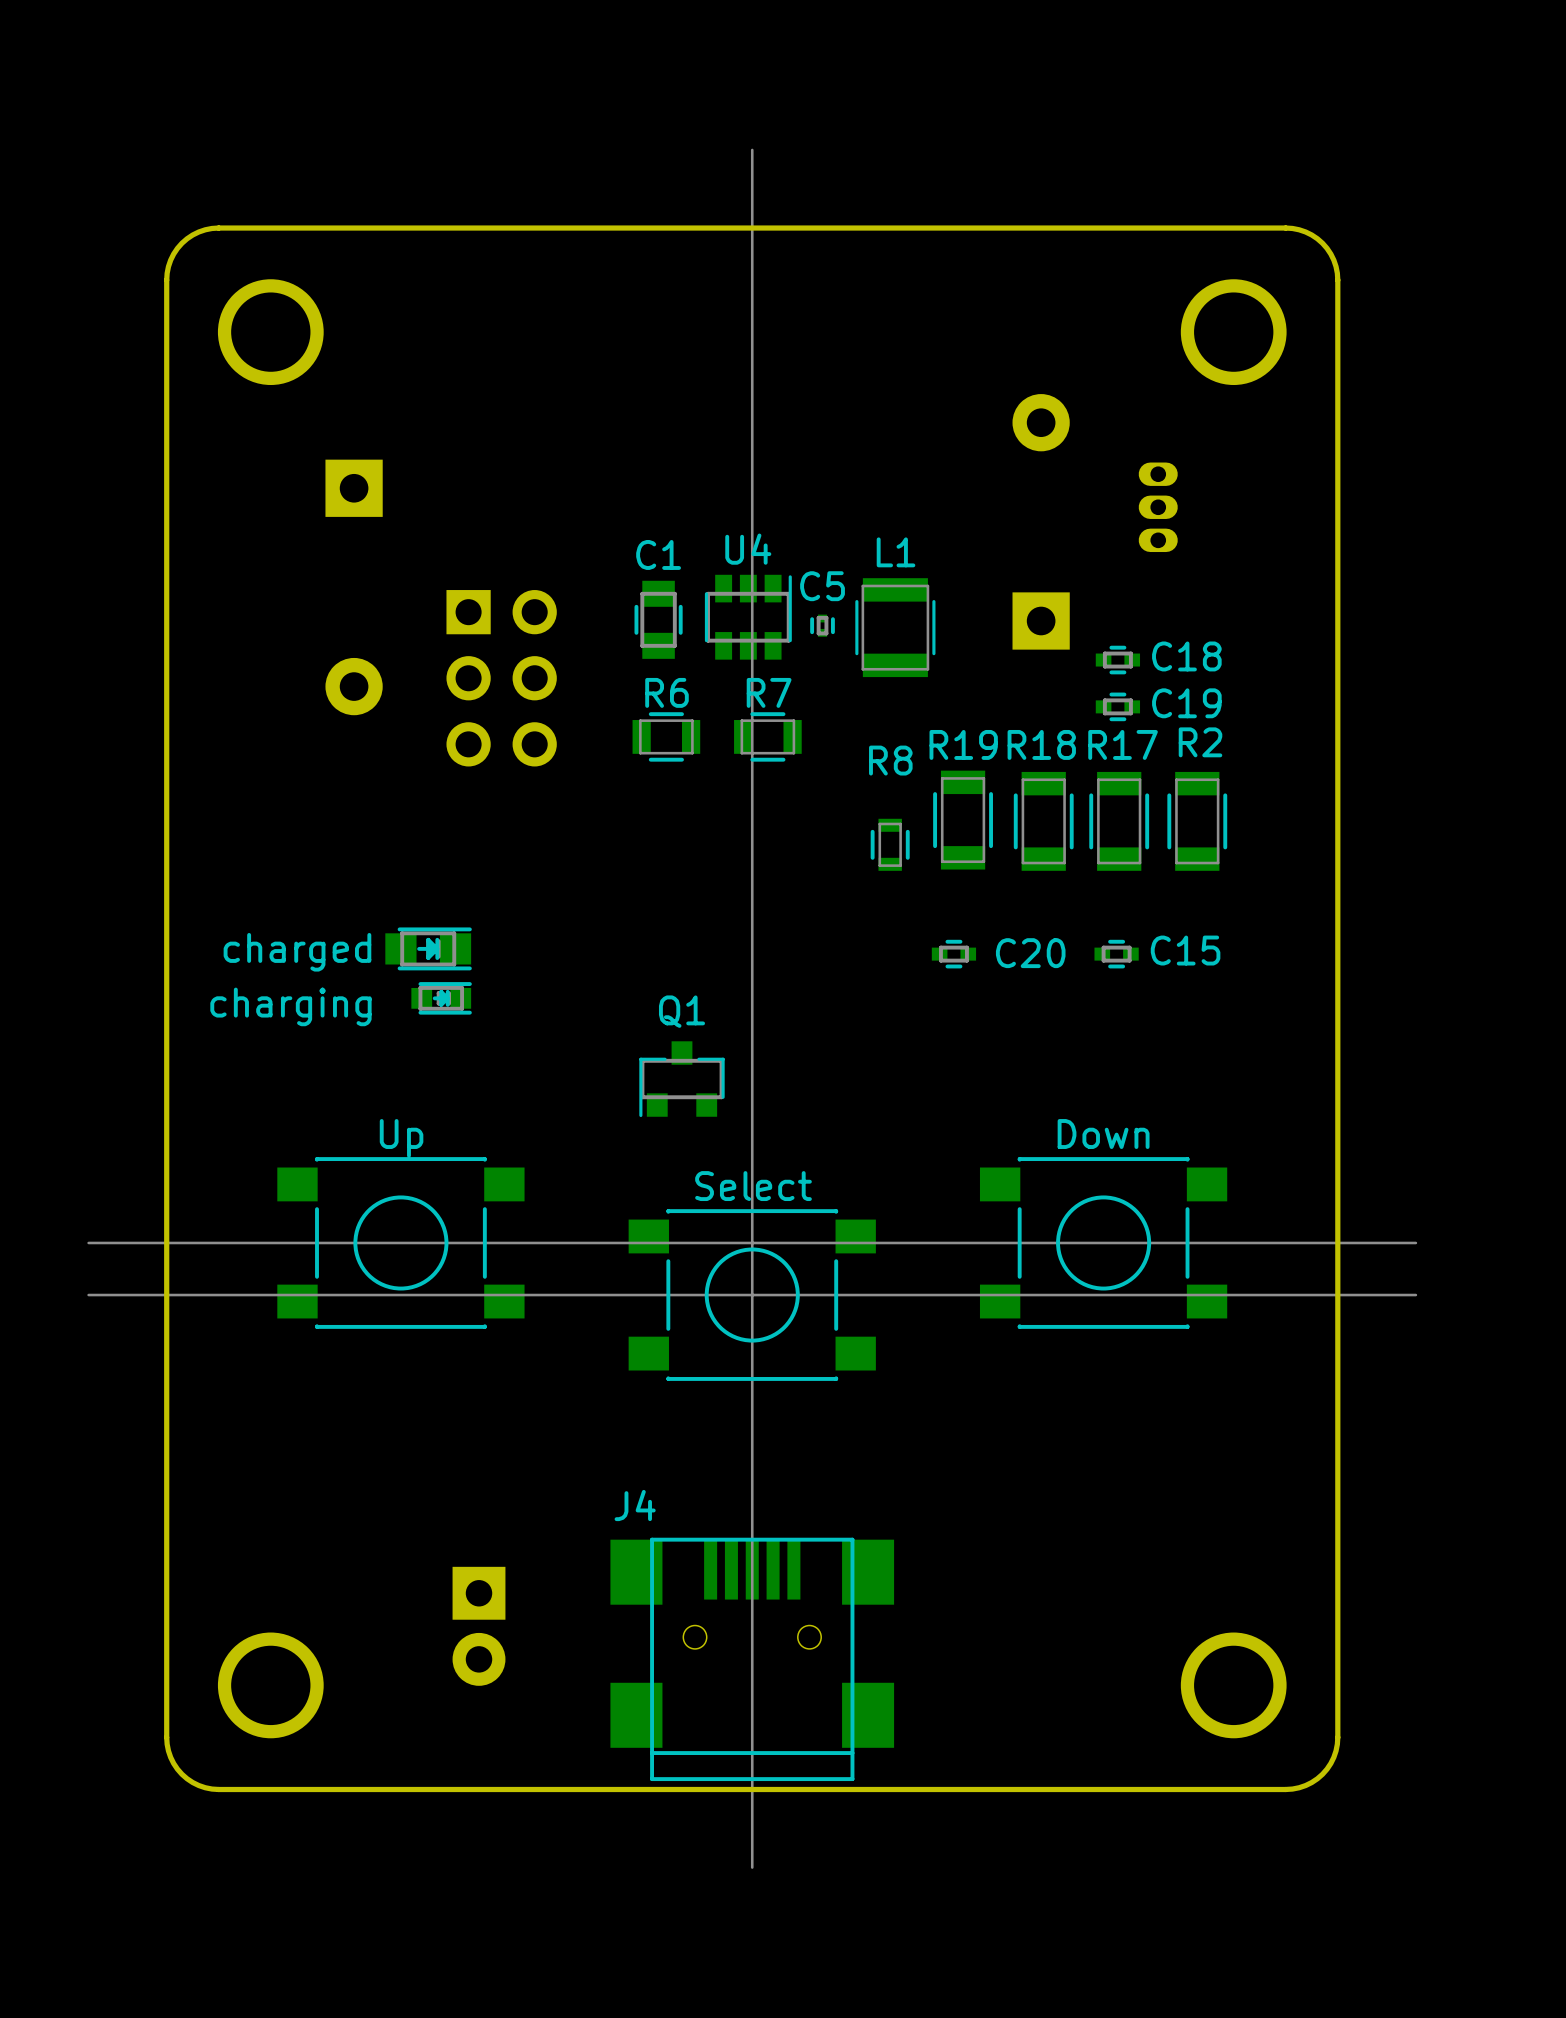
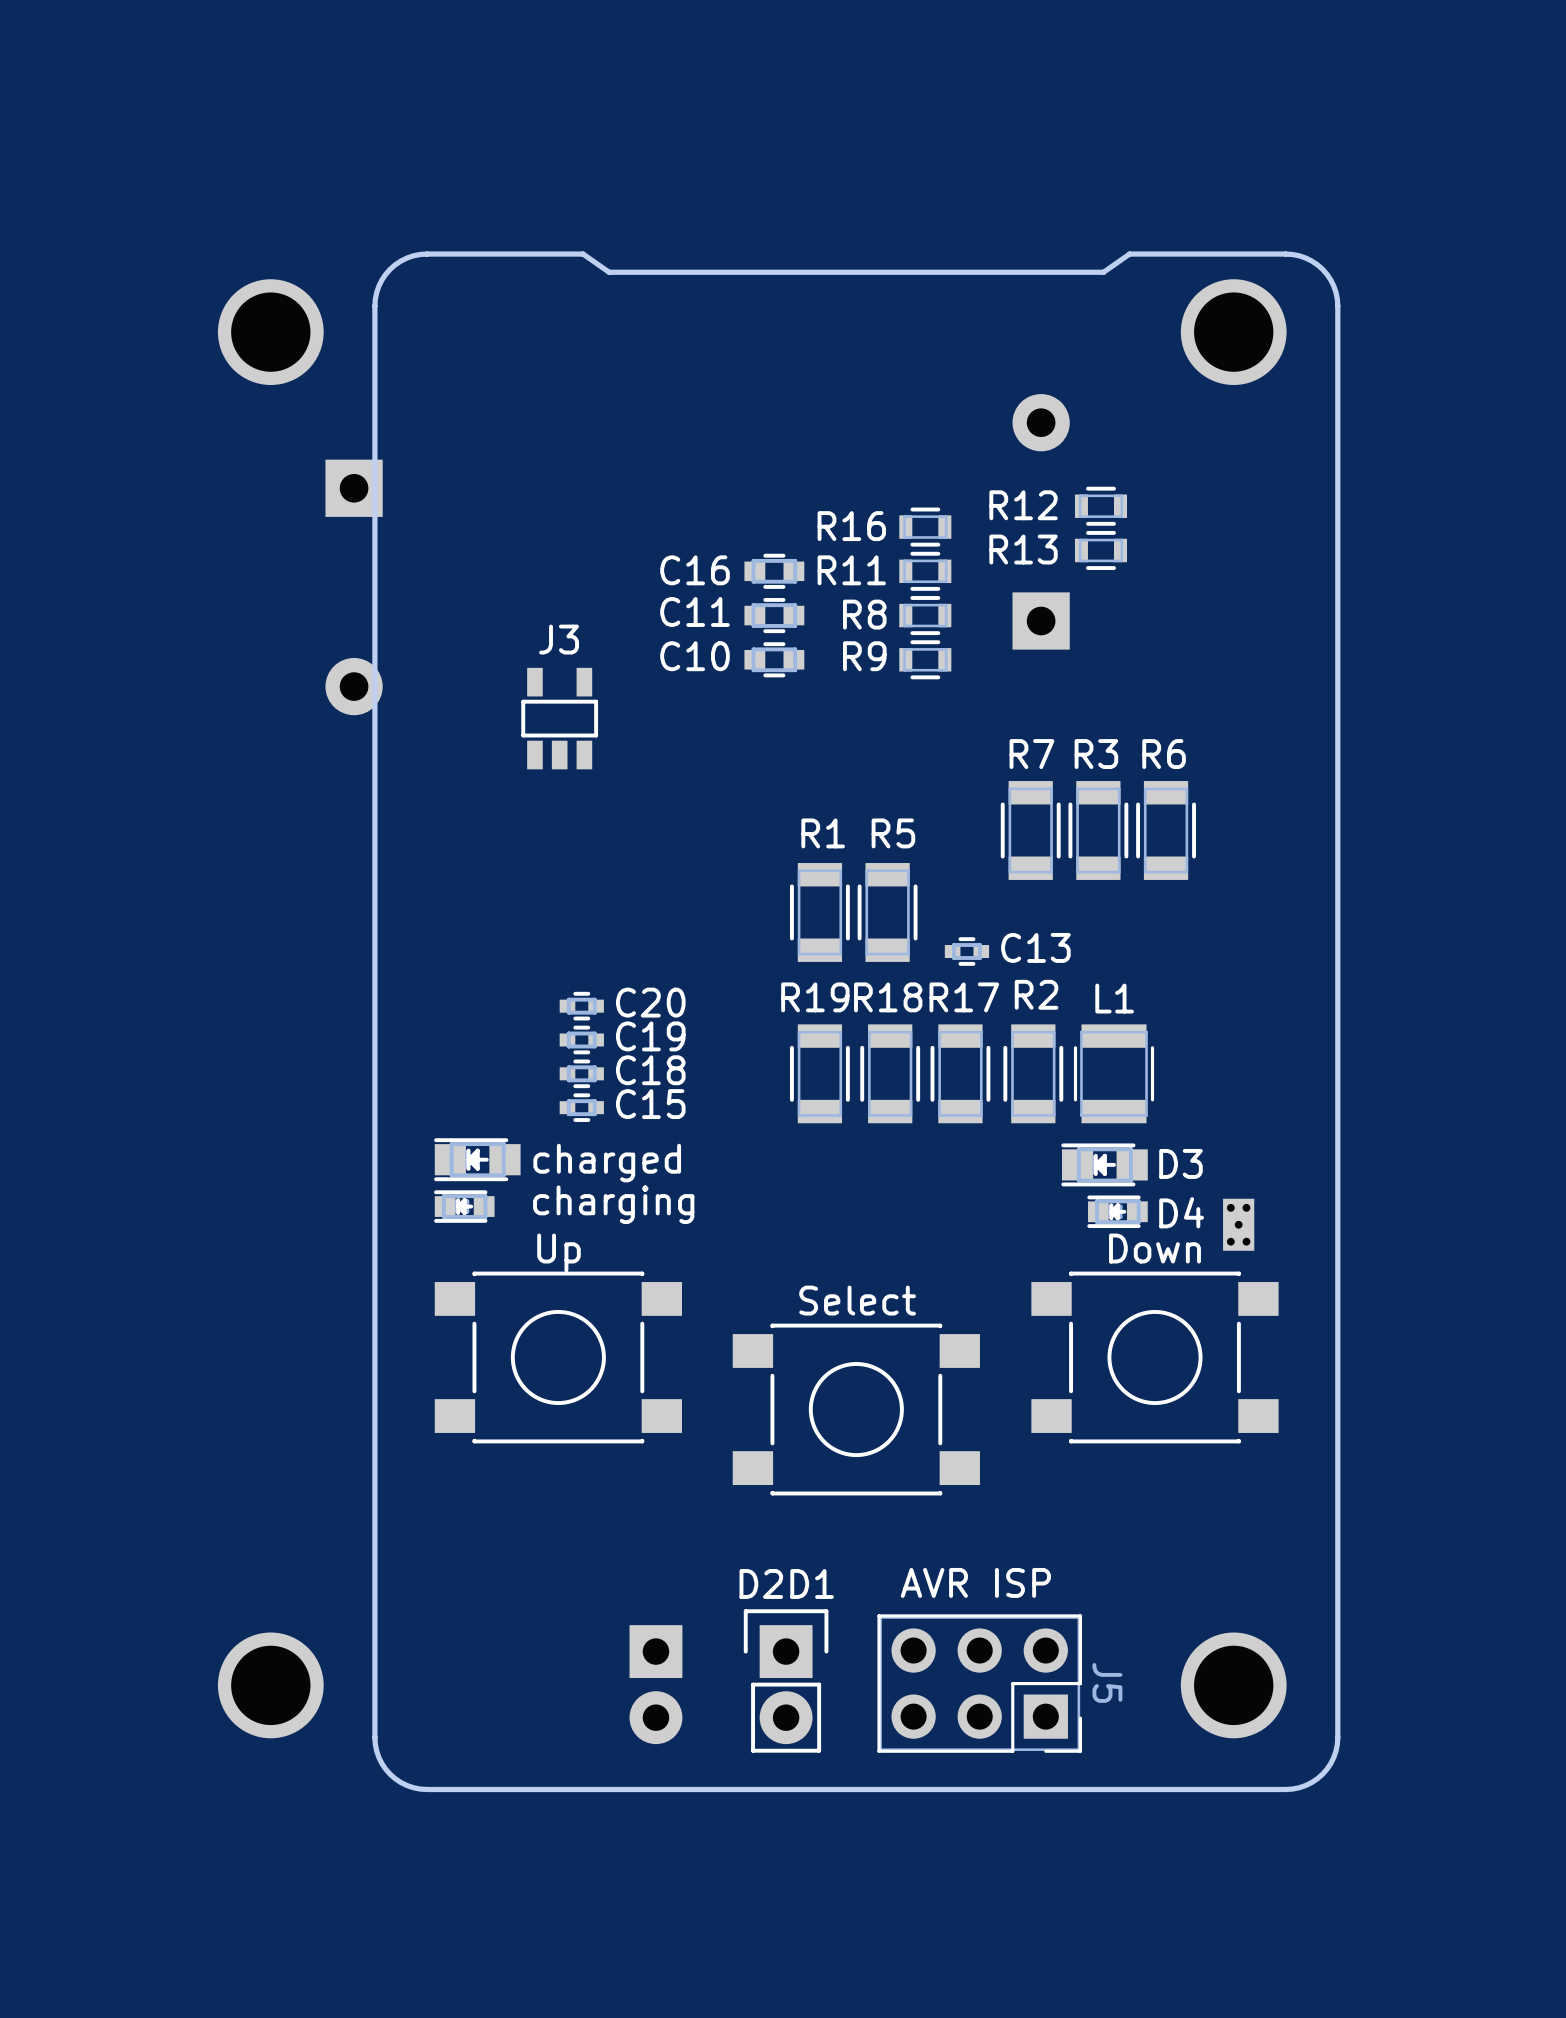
line: (752, 149) (752, 1867) -> none
board edge: (1337, 306) (1337, 273) (1330, 254) (1322, 243) (1311, 235) (1299, 229) (1285, 228) (218, 228) (205, 229) (192, 235) (181, 243) (173, 254) (168, 266) (166, 280) (167, 1744) (170, 1757) (181, 1774) (198, 1785) (211, 1789) (426, 1789) -> (1337, 306) (1333, 286) (1322, 269) (1305, 258) (1285, 254) (1129, 254) (1103, 272) (609, 272) (583, 254) (426, 254) (413, 255) (400, 261) (390, 269) (381, 280) (376, 292) (374, 306) (374, 1737) (378, 1757) (390, 1774) (407, 1785) (426, 1789)
R12: none -> (1100, 506)
part: (1158, 507) -> none
R16: none -> (925, 527)
R13: none -> (1100, 550)
C16: none -> (774, 571)
R11: none -> (925, 571)
C11: none -> (774, 615)
U4: (748, 617) -> none
C1: (658, 619) -> none
C5: (822, 625) -> none
L1 position: (895, 627) -> (1114, 1073)
C10: none -> (774, 659)
R9: none -> (925, 659)
C18 position: (1117, 660) -> (581, 1073)
part: (501, 678) -> none
C19 position: (1117, 706) -> (581, 1039)
R6 footprint: [632, 712, 701, 762] -> [1136, 781, 1196, 880]
R7 footprint: [734, 712, 802, 762] -> [1000, 781, 1061, 880]
J3: none -> (559, 718)
R19 name position: R19 (963, 744) -> R19 (815, 997)
R8 name position: R8 (890, 760) -> R8 (864, 614)
R19 position: (963, 820) -> (819, 1073)
R18 position: (1043, 821) -> (890, 1073)
R17 position: (1119, 821) -> (960, 1073)
R2 position: (1197, 821) -> (1033, 1073)
R3: none -> (1098, 830)
R8 rotation: 0° (890, 844) -> 90° clockwise (925, 615)
R8 position: (890, 844) -> (925, 615)
R1: none -> (819, 912)
R5: none -> (887, 912)
part rotation: 0° (428, 948) -> 180° (477, 1159)
part position: (428, 948) -> (477, 1159)
C13: none -> (966, 951)
C20 name position: C20 (1030, 953) -> C20 (650, 1002)
C20 position: (953, 954) -> (581, 1006)
C15 position: (1116, 954) -> (581, 1107)
part rotation: 0° (441, 998) -> 180° (464, 1206)
part position: (441, 998) -> (464, 1206)
Q1: (681, 1079) -> none
D3: none -> (1104, 1164)
D4: none -> (1117, 1211)
part: none -> (1238, 1224)
part position: (400, 1242) -> (558, 1357)
part position: (1103, 1242) -> (1154, 1357)
line: (1415, 1242) (88, 1242) -> none
part position: (752, 1295) -> (856, 1409)
line: (1415, 1295) (88, 1295) -> none
part position: (479, 1626) -> (655, 1684)
J4: (752, 1659) -> none
part: none -> D2D1 (786, 1680)
J5: none -> AVR ISP (979, 1683)

